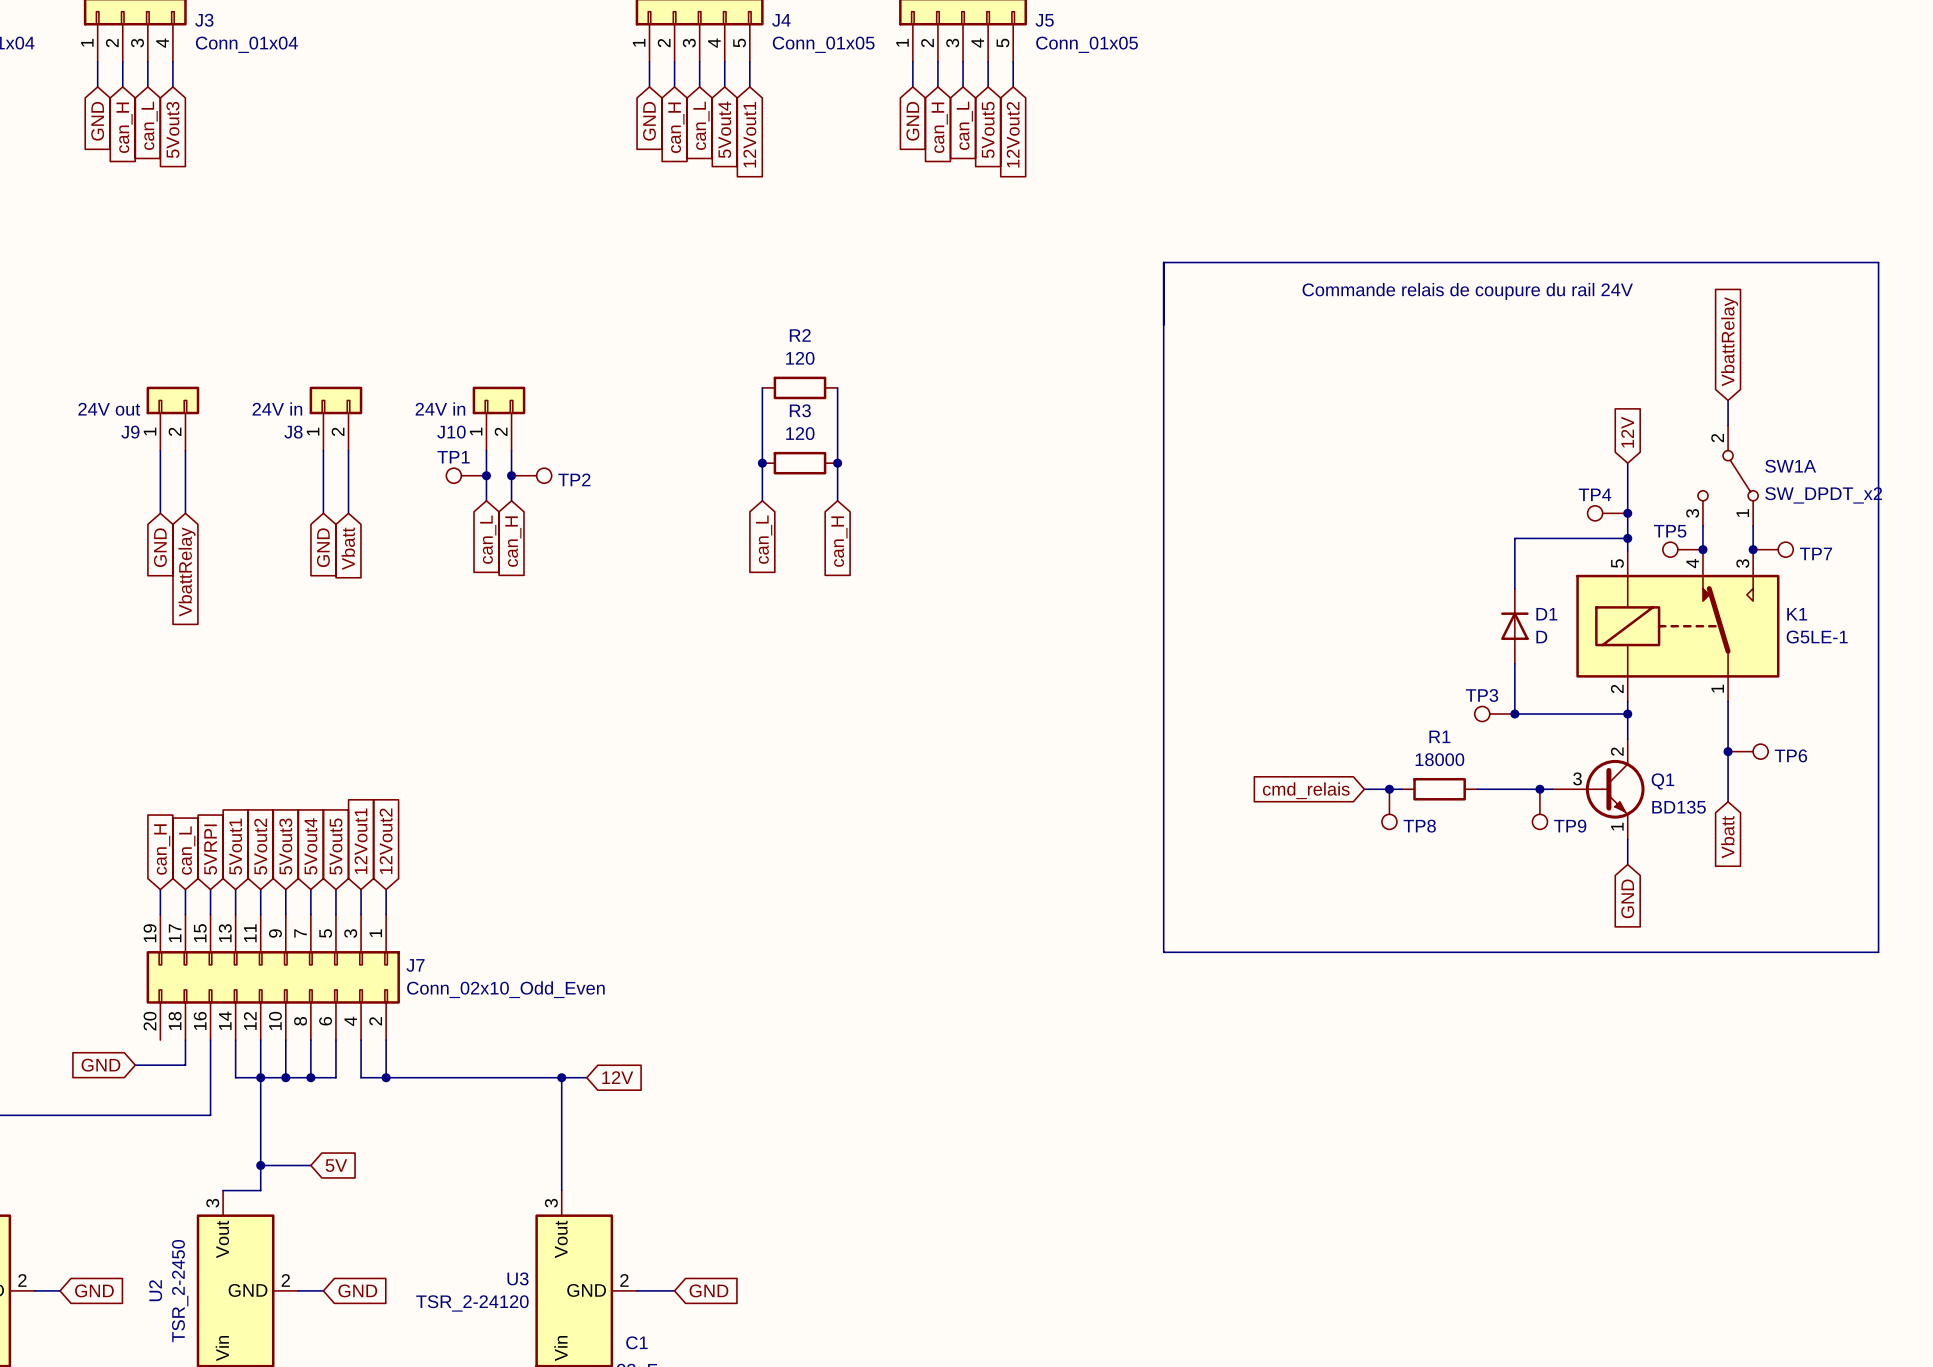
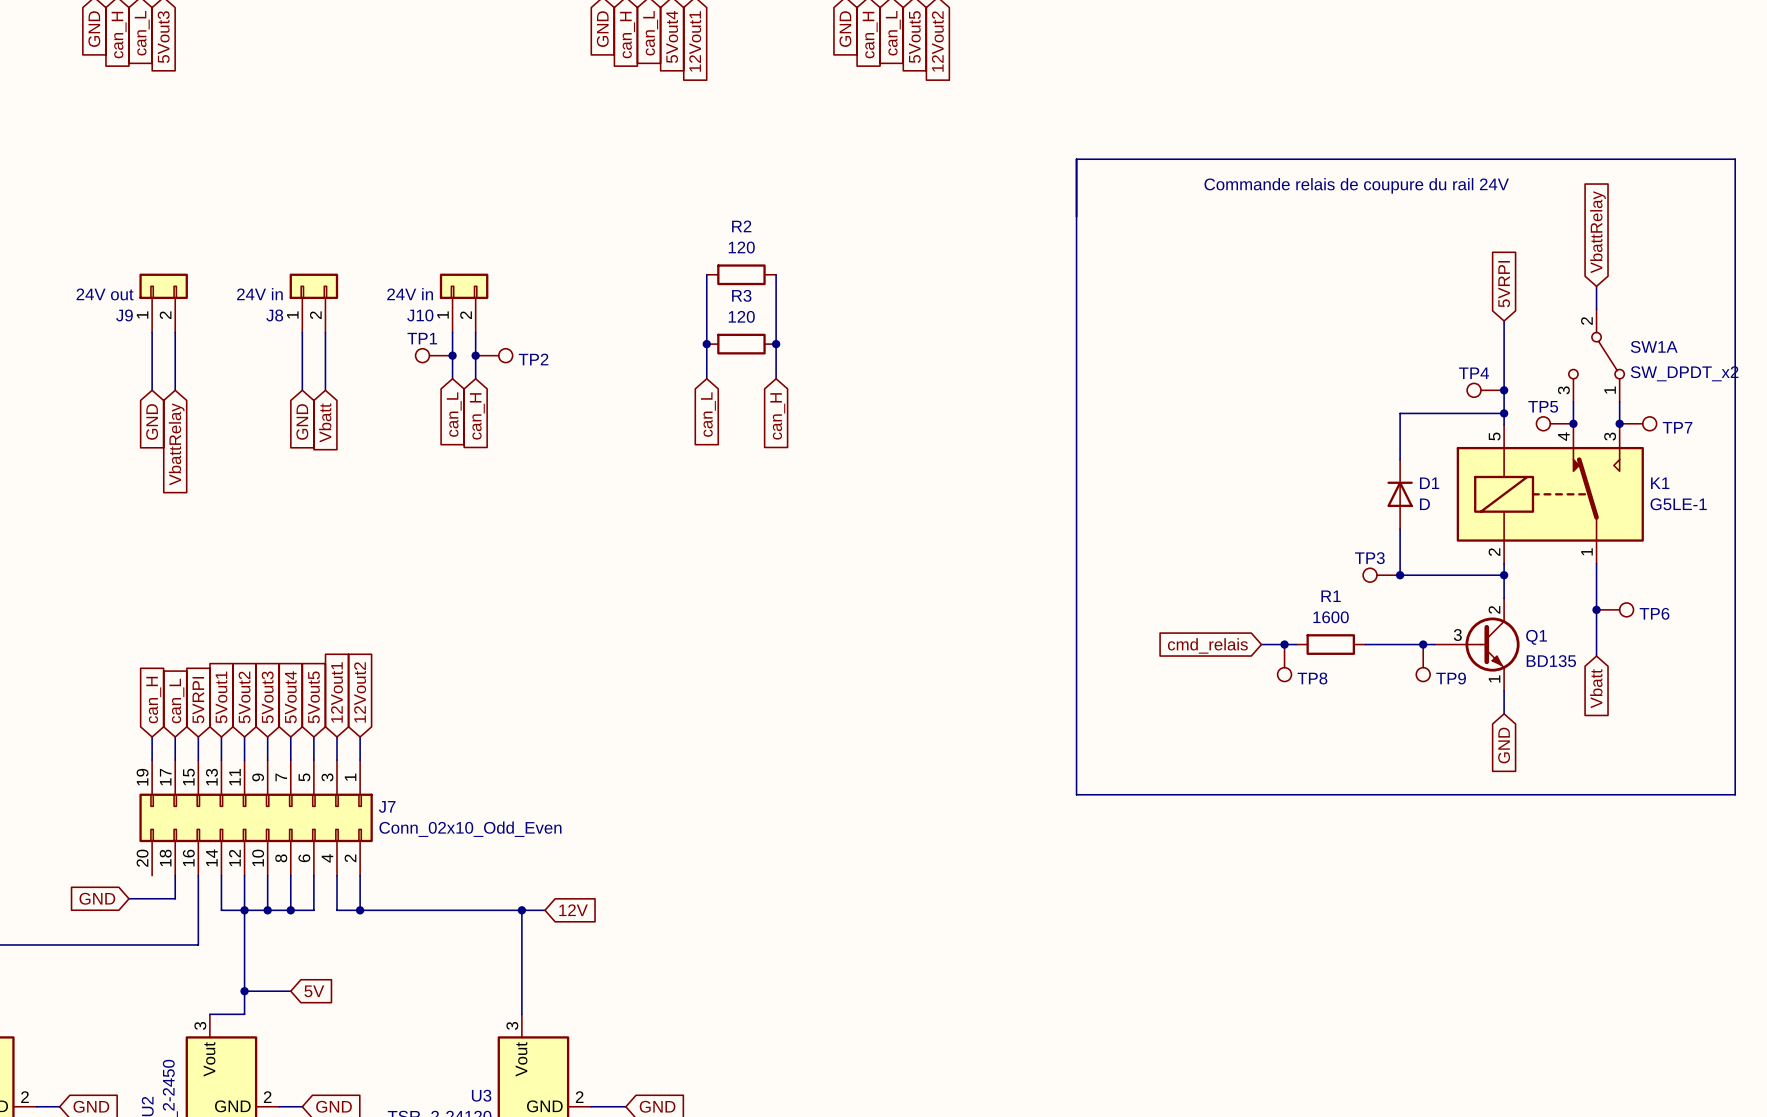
global label: none -> 5VRPI (1504, 284)
global label: 12V (1627, 432) -> none
wire: none -> (1504, 320) (1504, 344)
R1 value: 18000 (1439, 759) -> 1600 (1331, 617)

